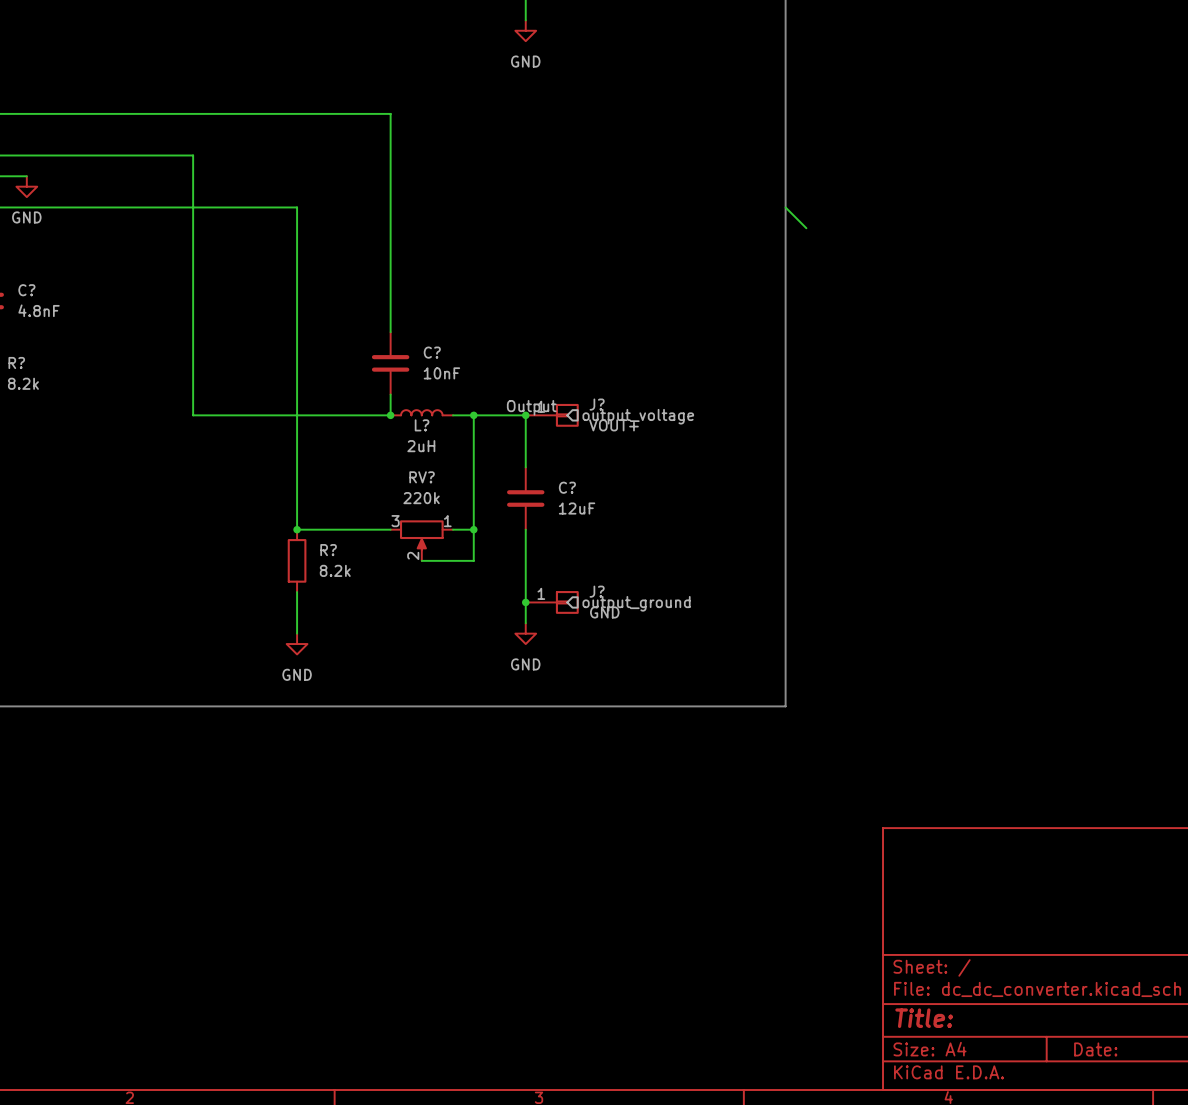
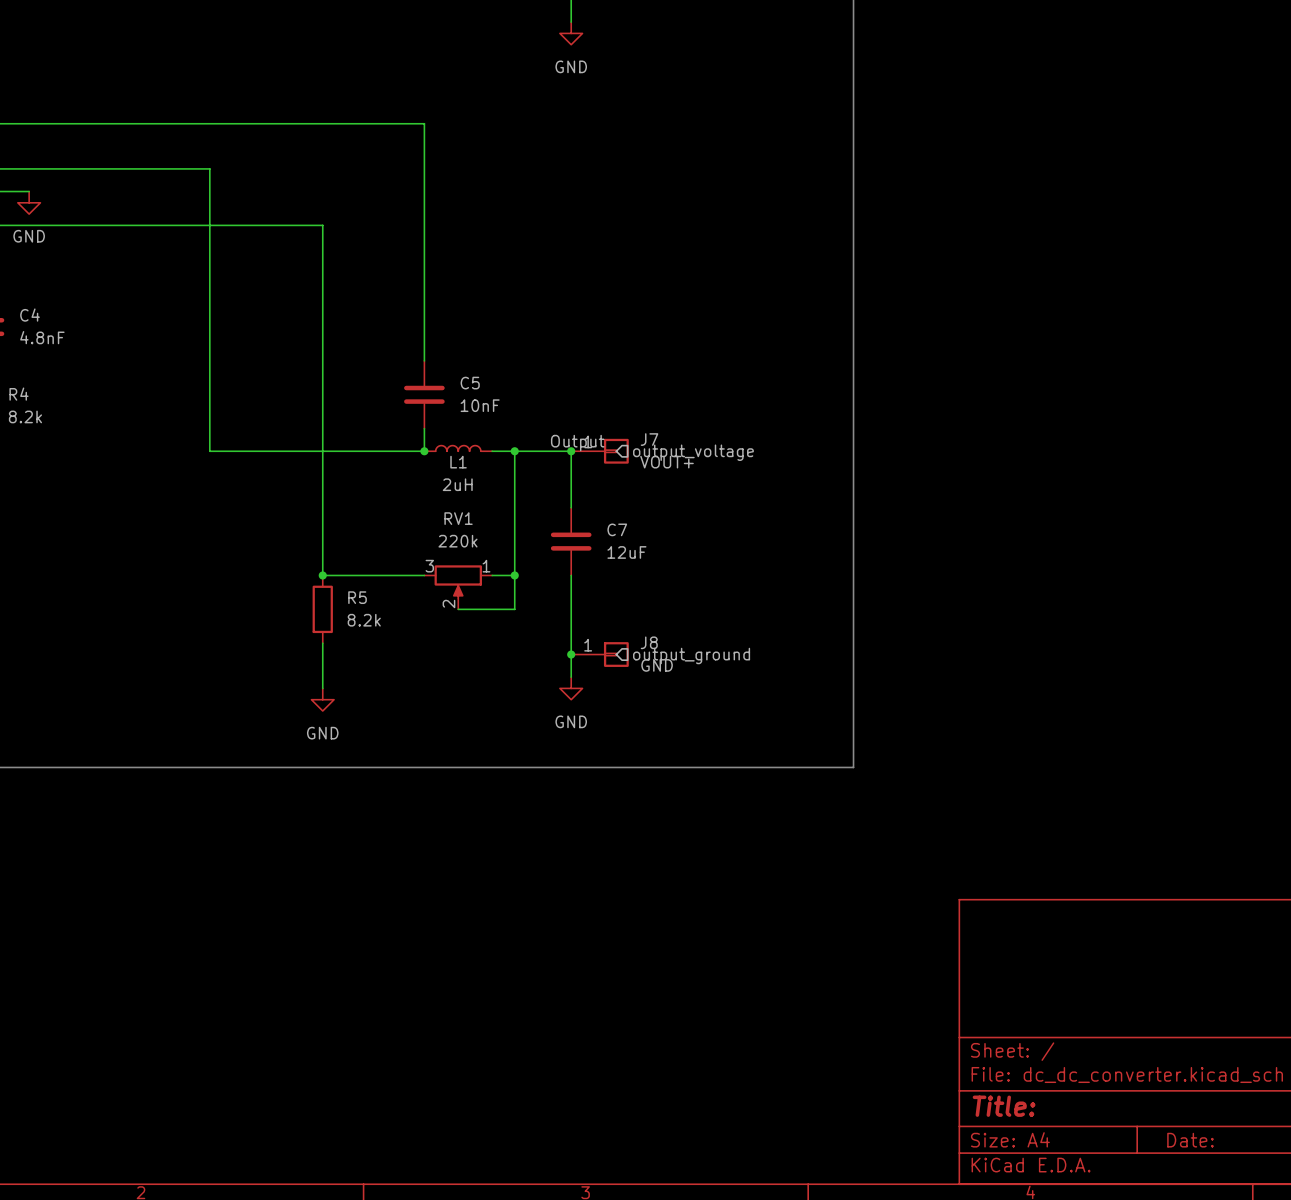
wire: (785, 207) (806, 228) -> none
C? name: C? (26, 290) -> C4 (30, 315)
C? name: C? (432, 352) -> C5 (470, 383)
R? name: R? (16, 362) -> R4 (19, 394)
J? name: J? (597, 404) -> J7 (649, 439)
L? name: L? (422, 425) -> L1 (458, 462)
RV? name: RV? (422, 477) -> RV1 (458, 518)
C? name: C? (567, 487) -> C7 (617, 529)
R? name: R? (328, 550) -> R5 (357, 597)
J? name: J? (597, 591) -> J8 (649, 642)

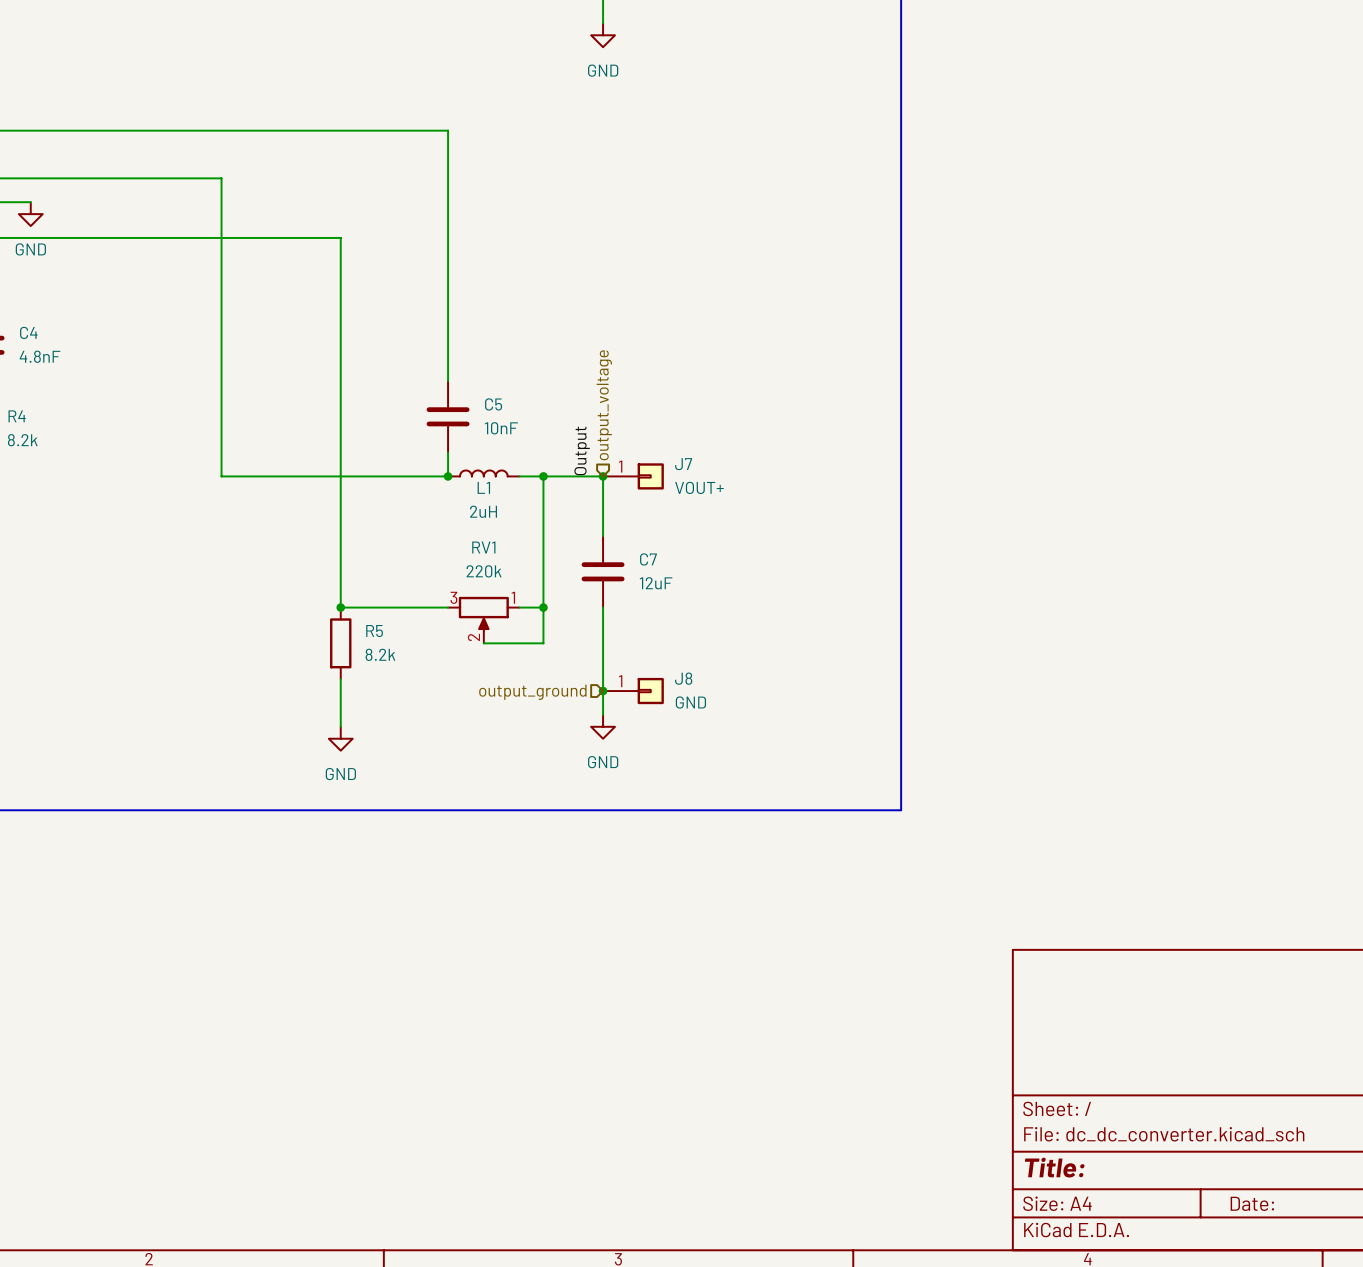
label rotation: 0° (577, 443) -> 90° counterclockwise (582, 450)
hierarchical label rotation: 0° (693, 452) -> 90° counterclockwise (604, 405)
hierarchical label position: output_voltage (693, 452) -> output_voltage (604, 405)
hierarchical label rotation: 0° (691, 655) -> 180° (532, 692)
hierarchical label position: output_ground (691, 655) -> output_ground (532, 692)

